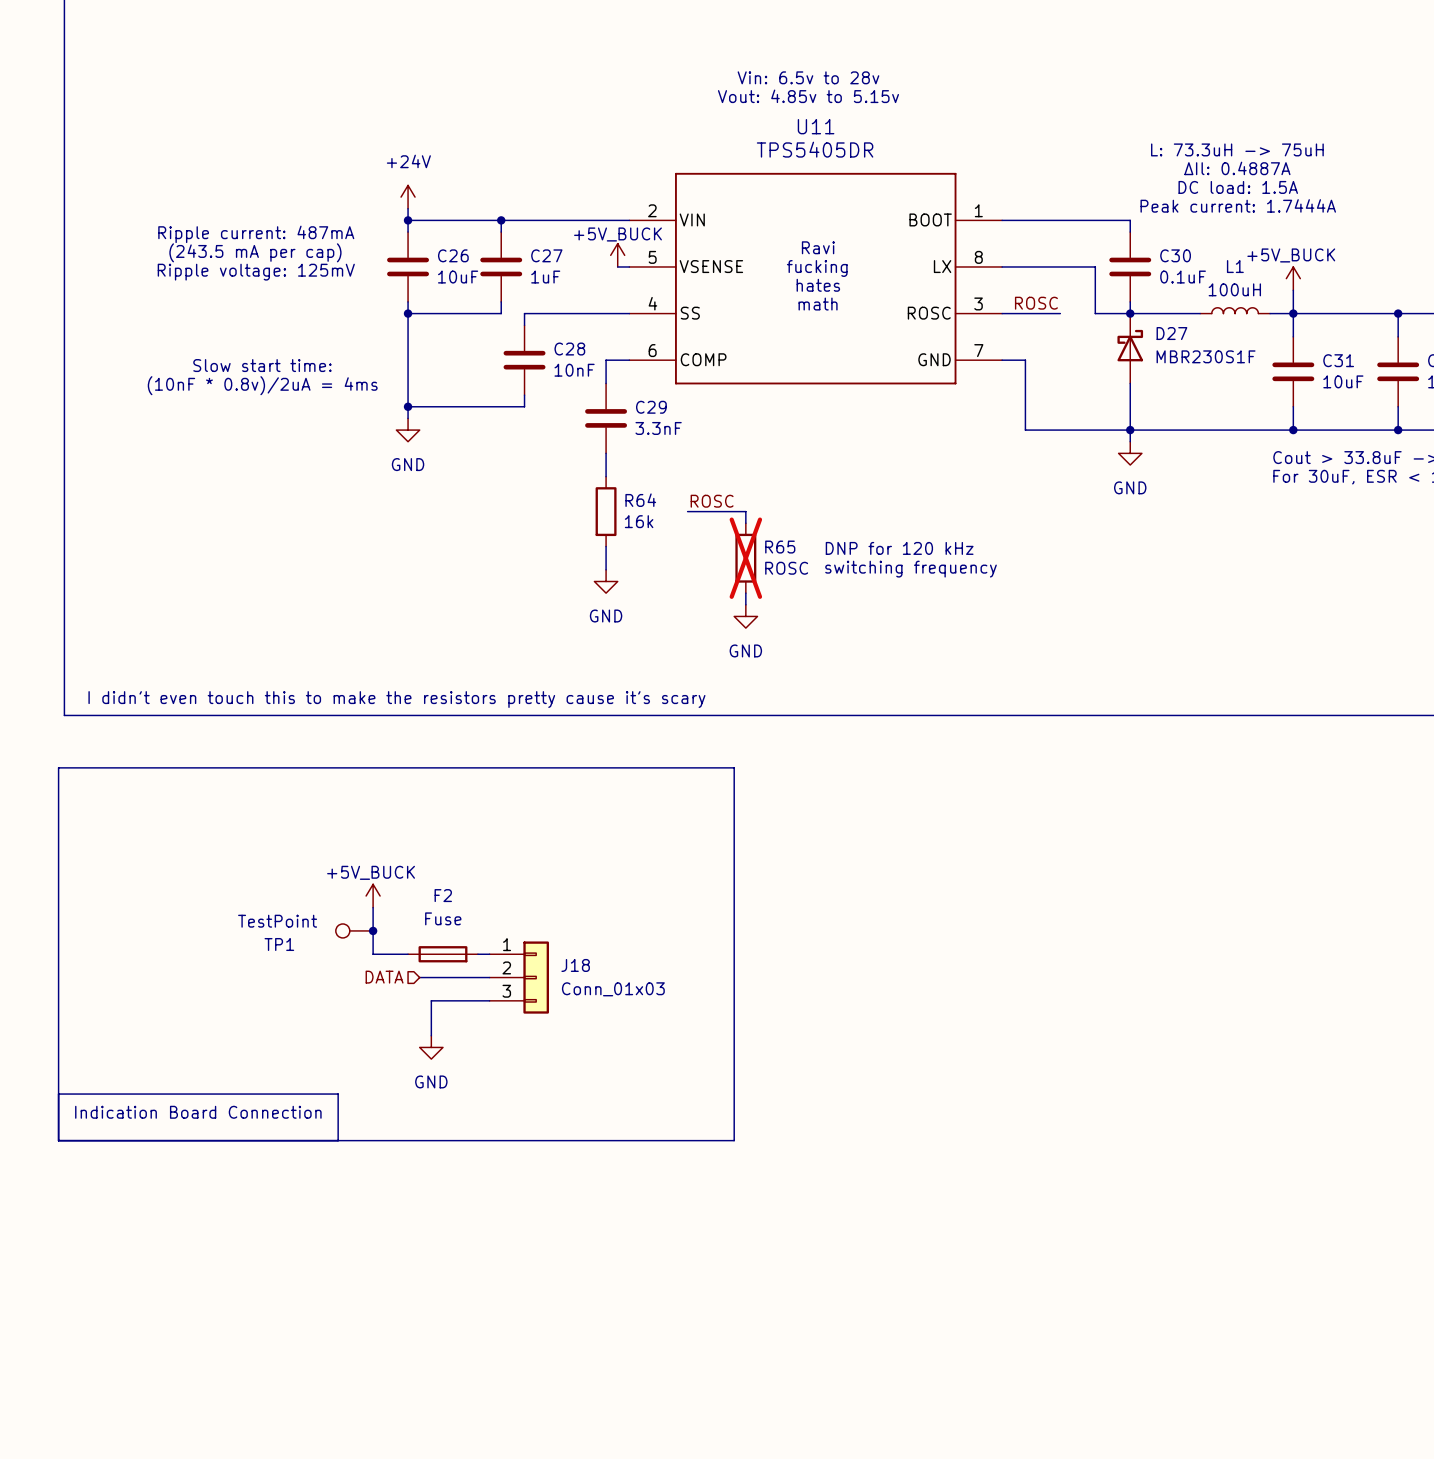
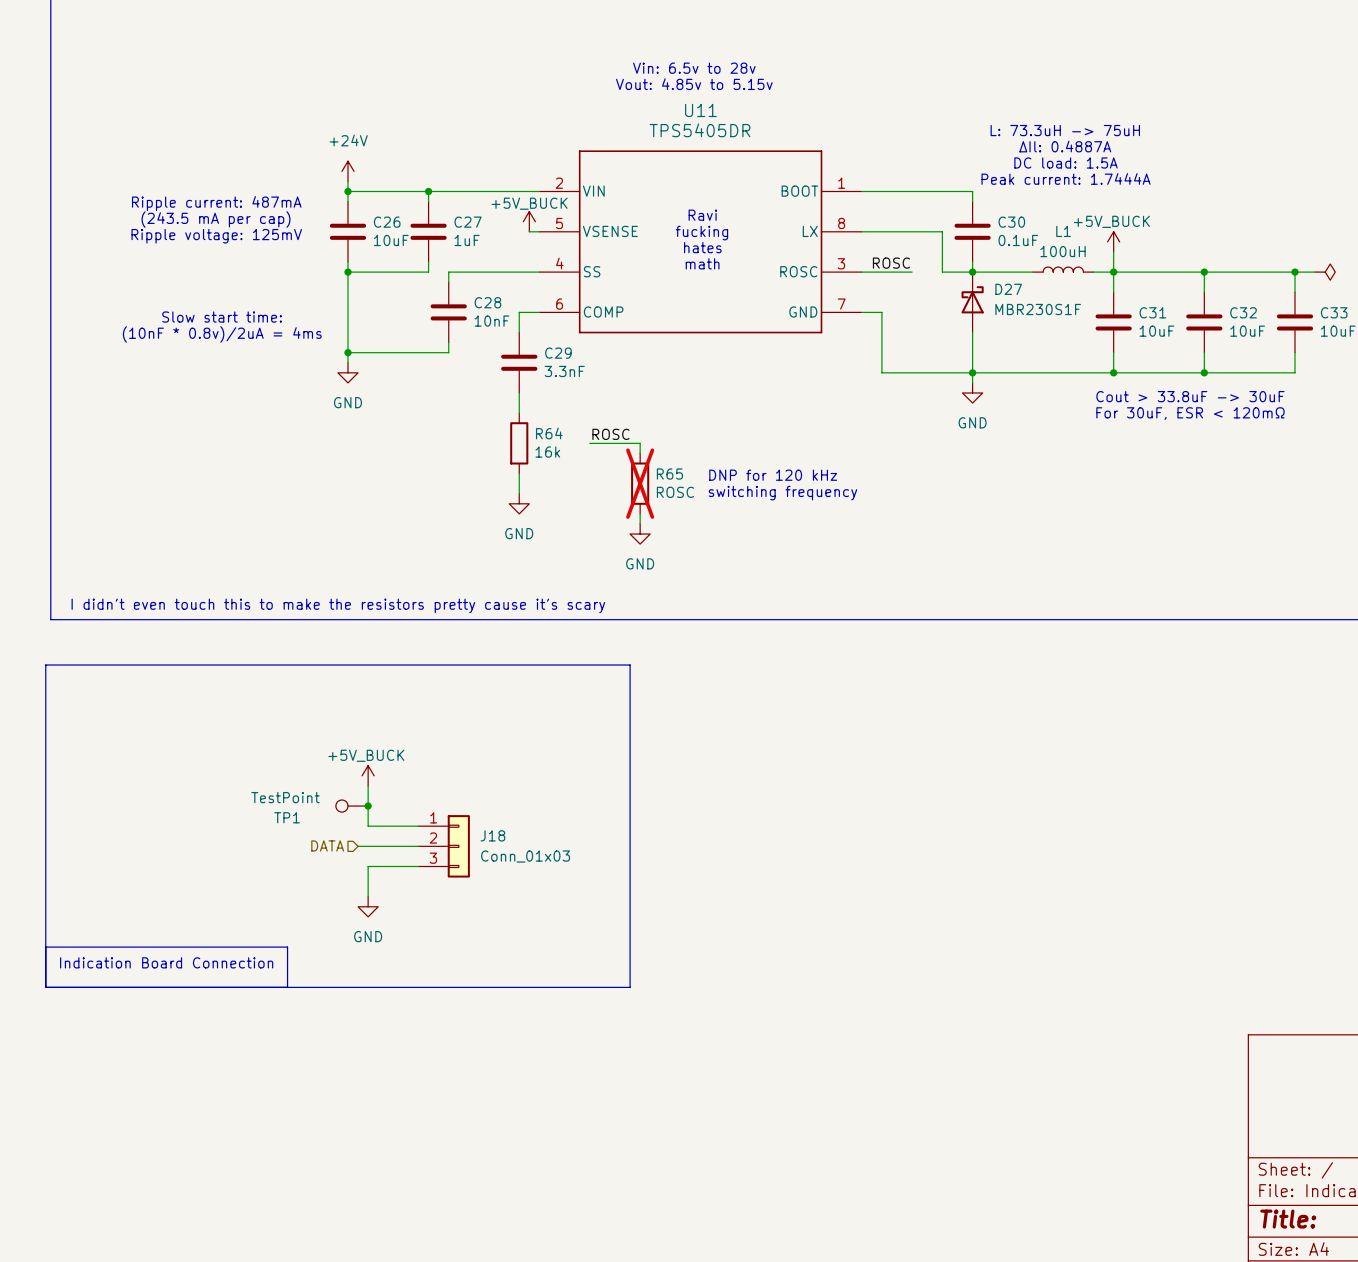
power symbol position: +5V_BUCK (373, 896) -> +5V_BUCK (368, 775)
wire: (373, 907) (373, 954) (408, 954) -> none
wire: none -> (368, 785) (368, 826) (408, 826)
TP1 position: (354, 930) -> (352, 806)
junction: (373, 930) -> none
junction: none -> (368, 806)
F2: Fuse (442, 954) -> none

